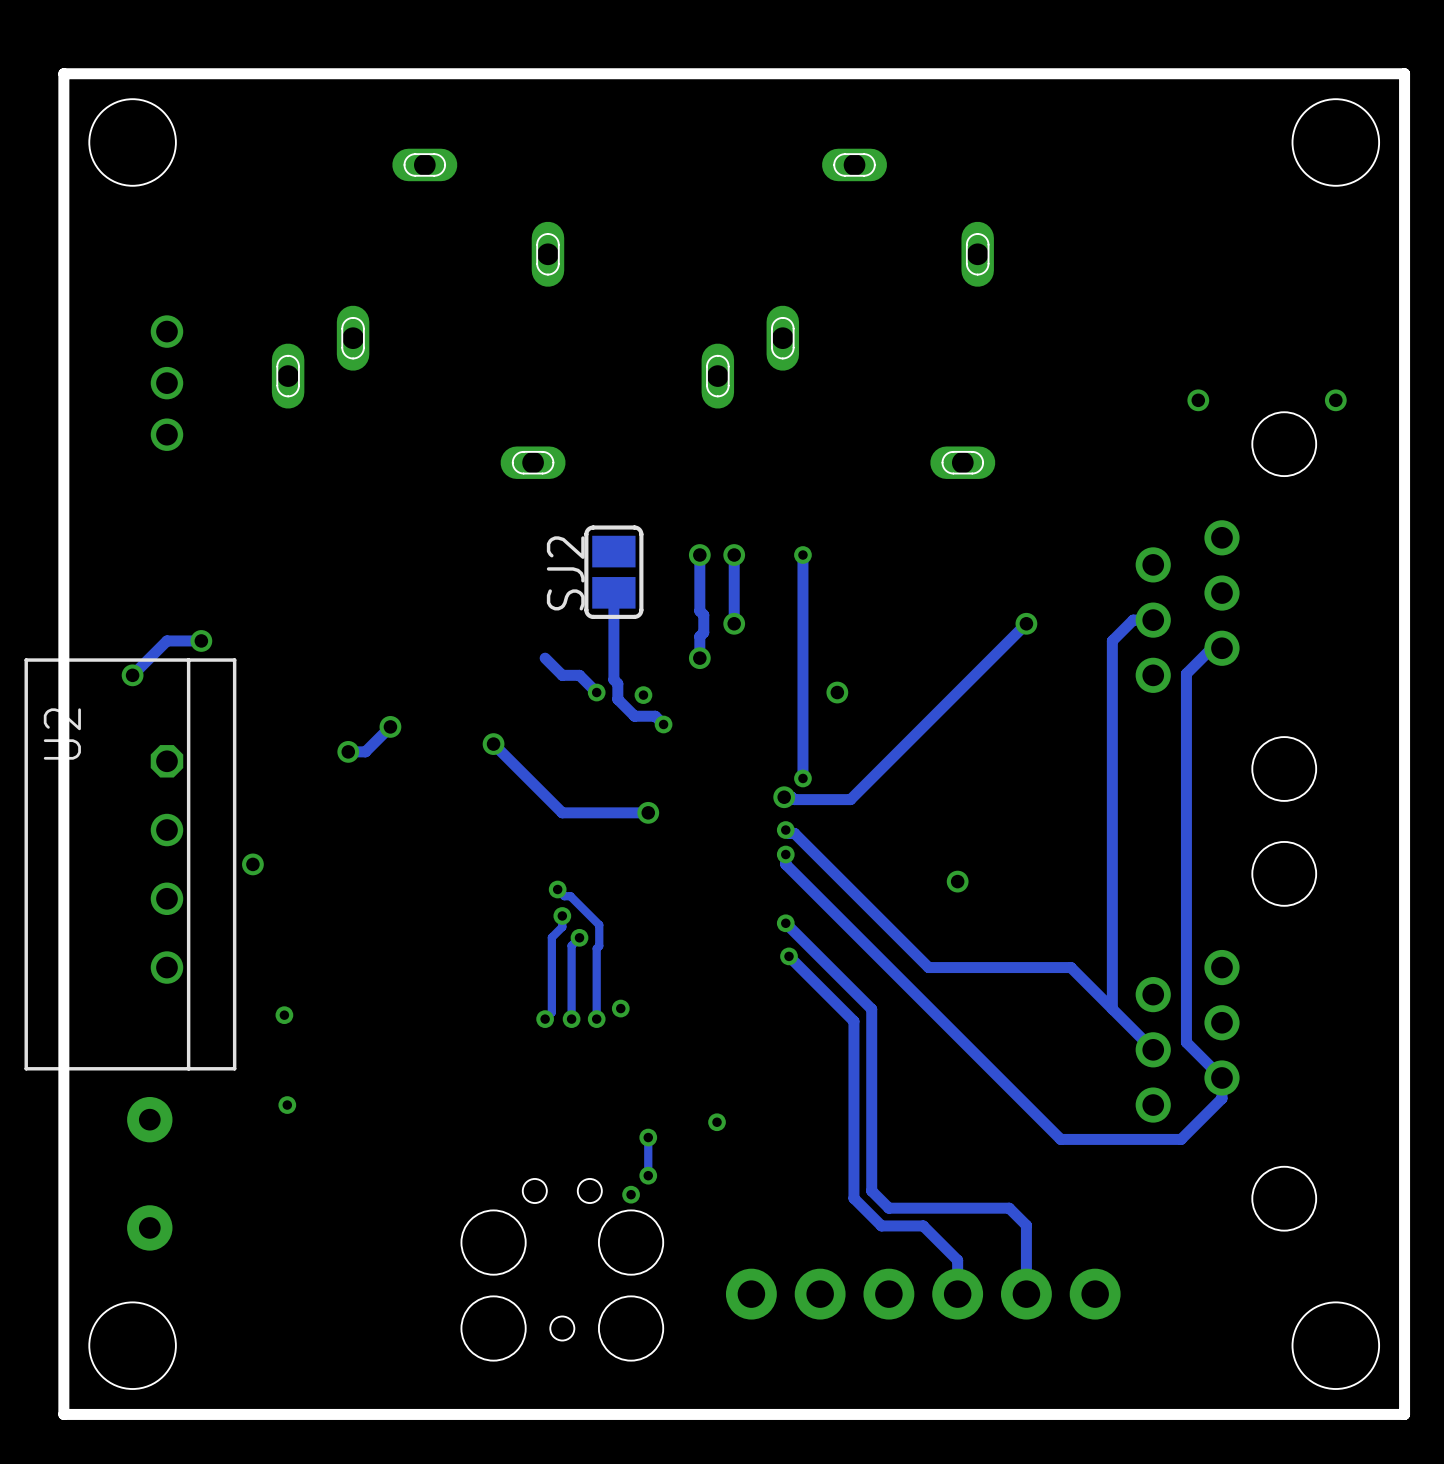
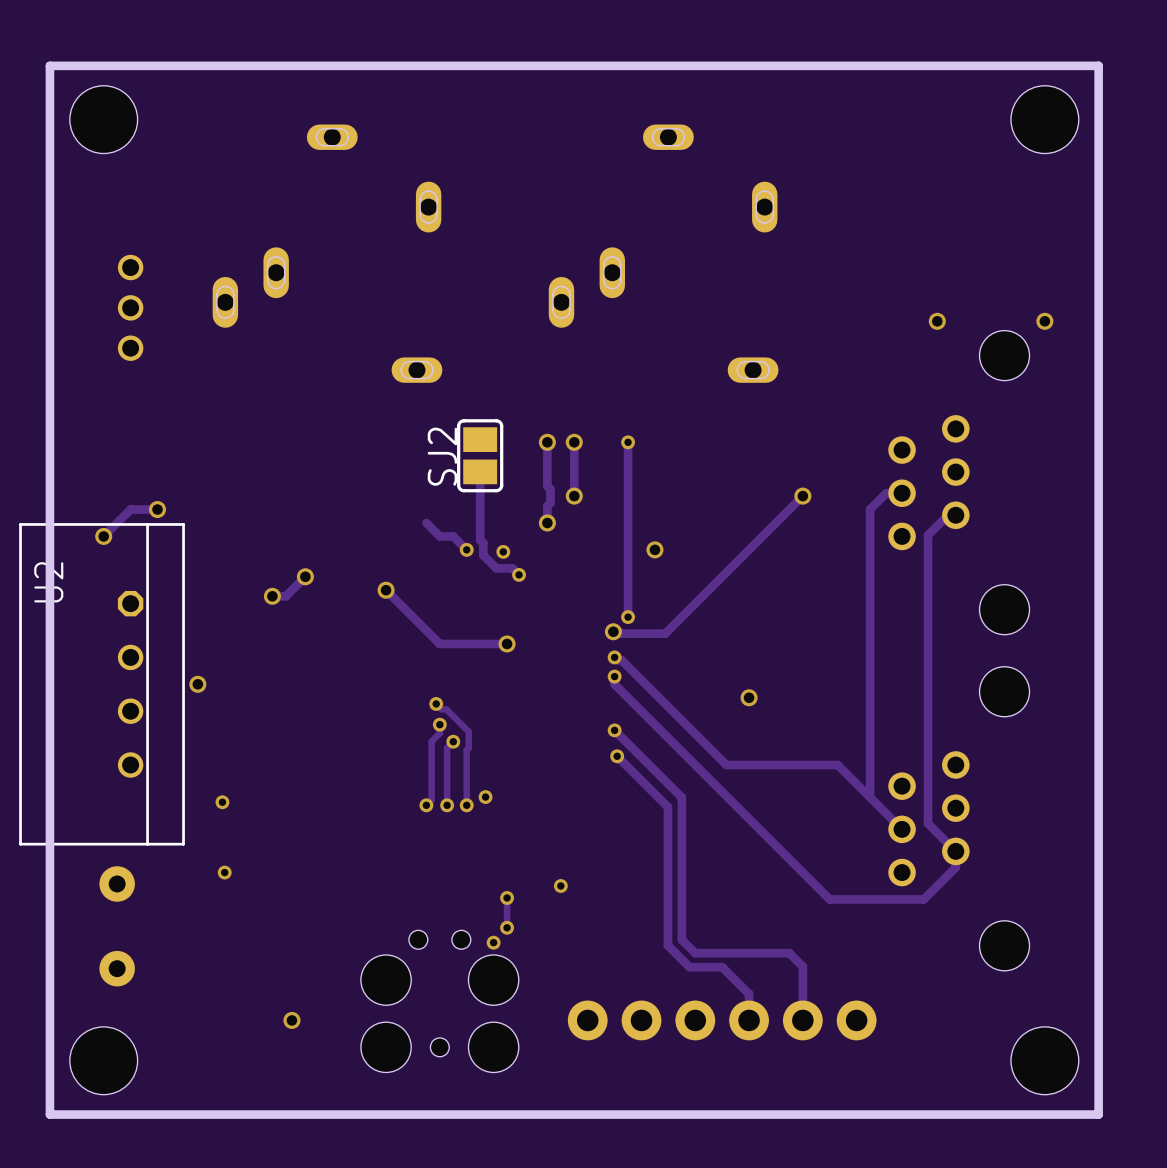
via: none -> (291, 1020)

